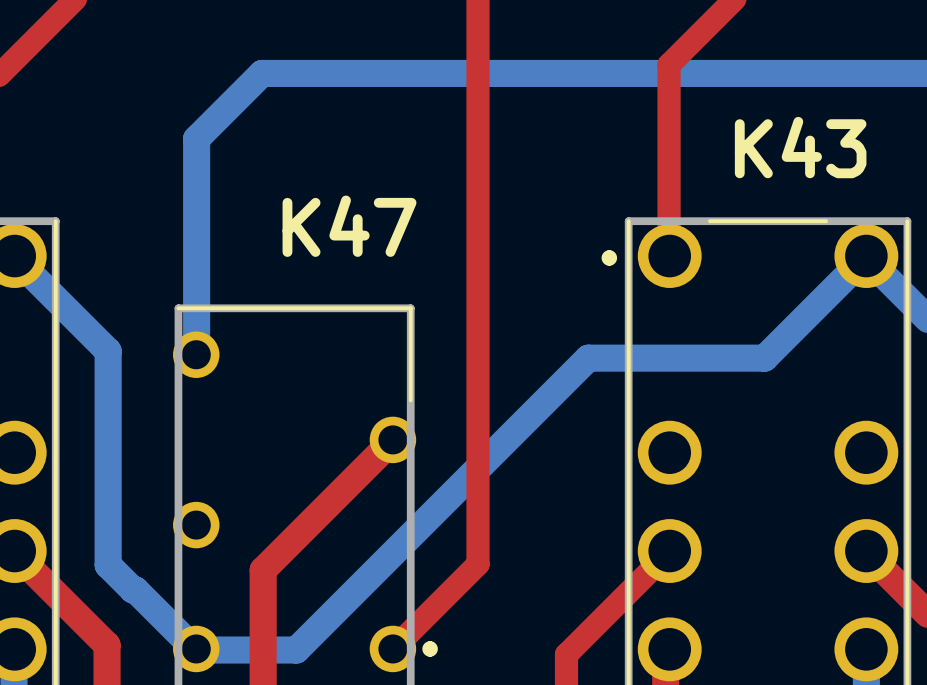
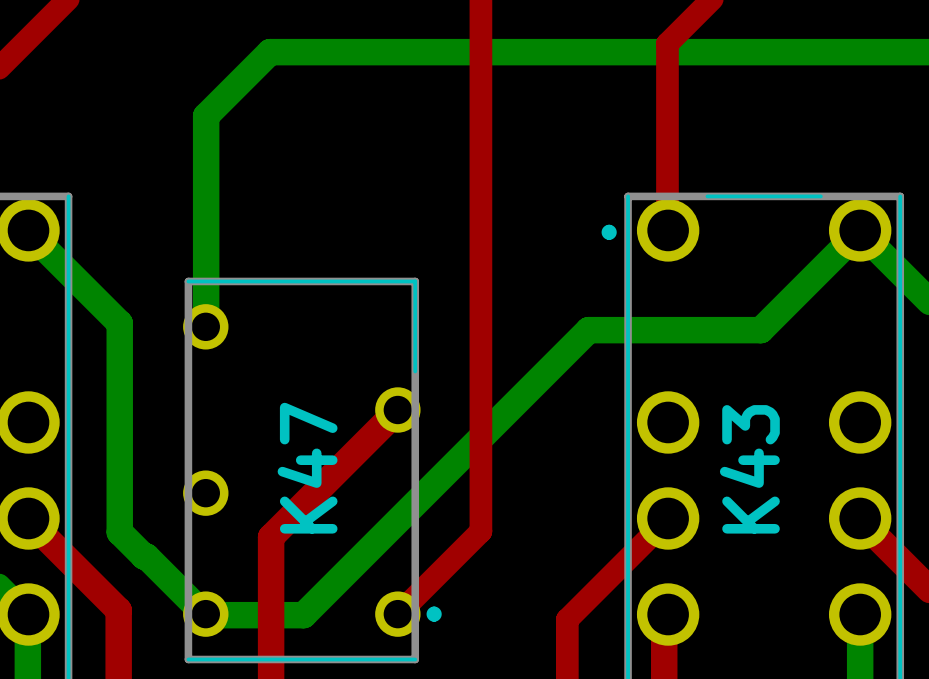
K43 name rotation: 0° (800, 147) -> 90° counterclockwise (749, 469)
K43 name position: K43 (800, 147) -> K43 (749, 469)
K47 name rotation: 0° (349, 226) -> 90° counterclockwise (307, 468)
K47 name position: K47 (349, 226) -> K47 (307, 468)

